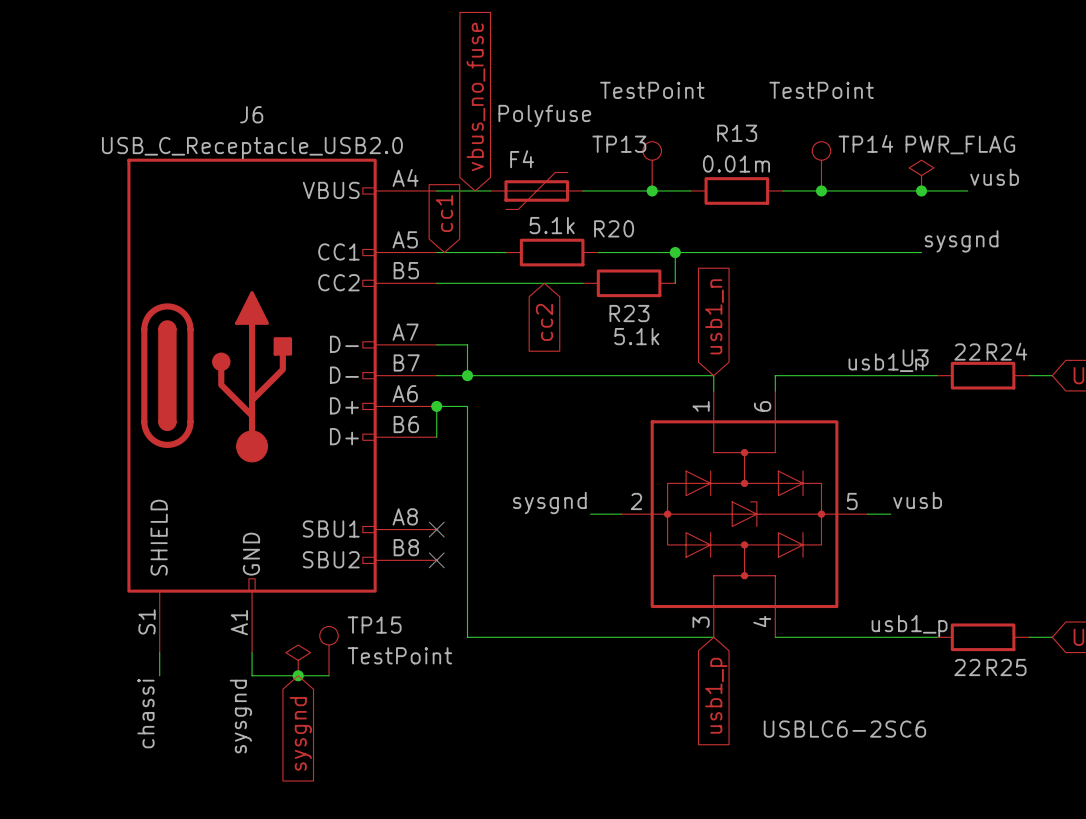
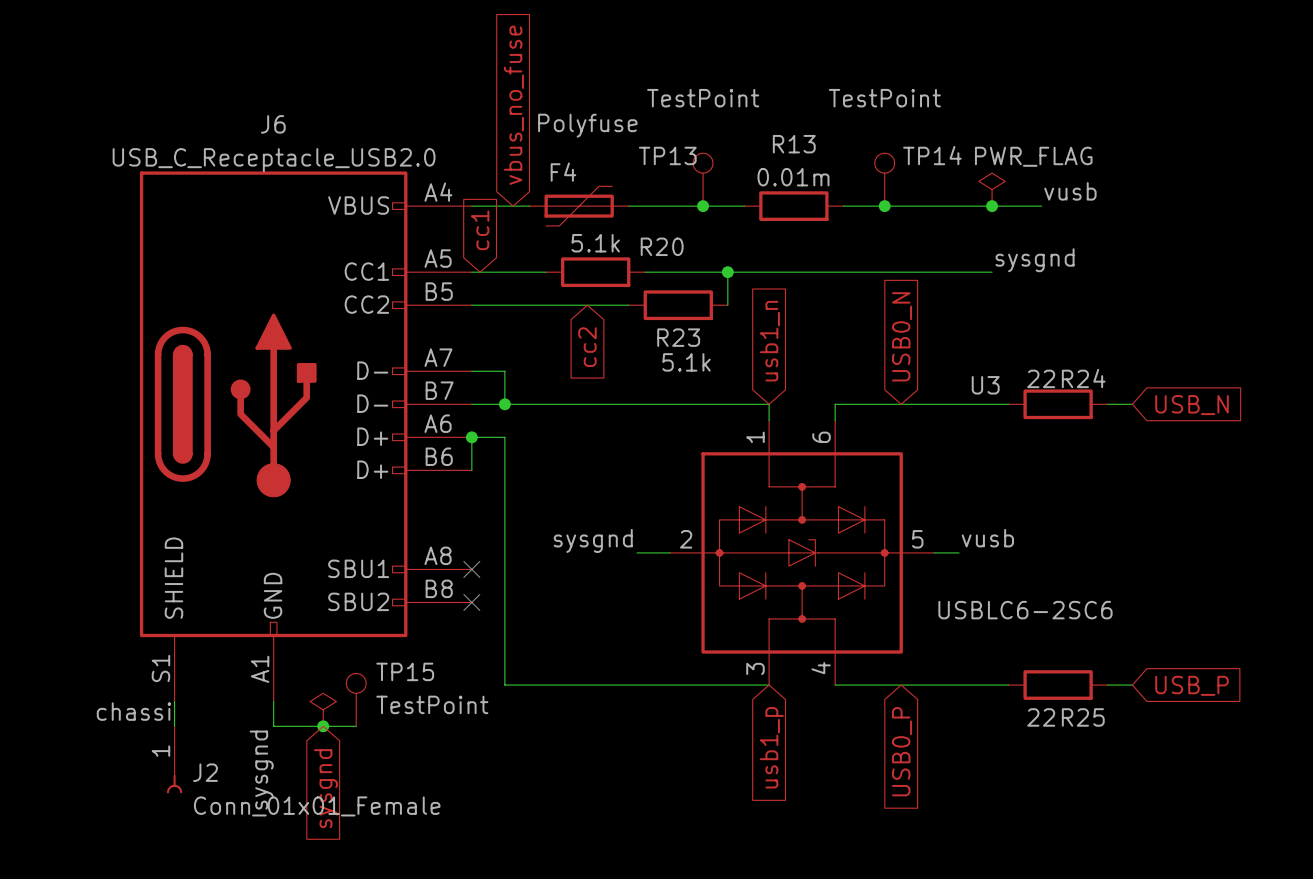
global label: none -> USB0_N (902, 336)
label: usb1_n (886, 362) -> none
label: usb1_p (909, 626) -> none
global label: none -> USB0_P (902, 751)
J2: none -> Conn_01x01_Female (174, 759)
label rotation: 0° (145, 713) -> 90° clockwise (133, 711)
U3 value position: USBLC6-2SC6 (844, 729) -> USBLC6-2SC6 (1025, 610)

